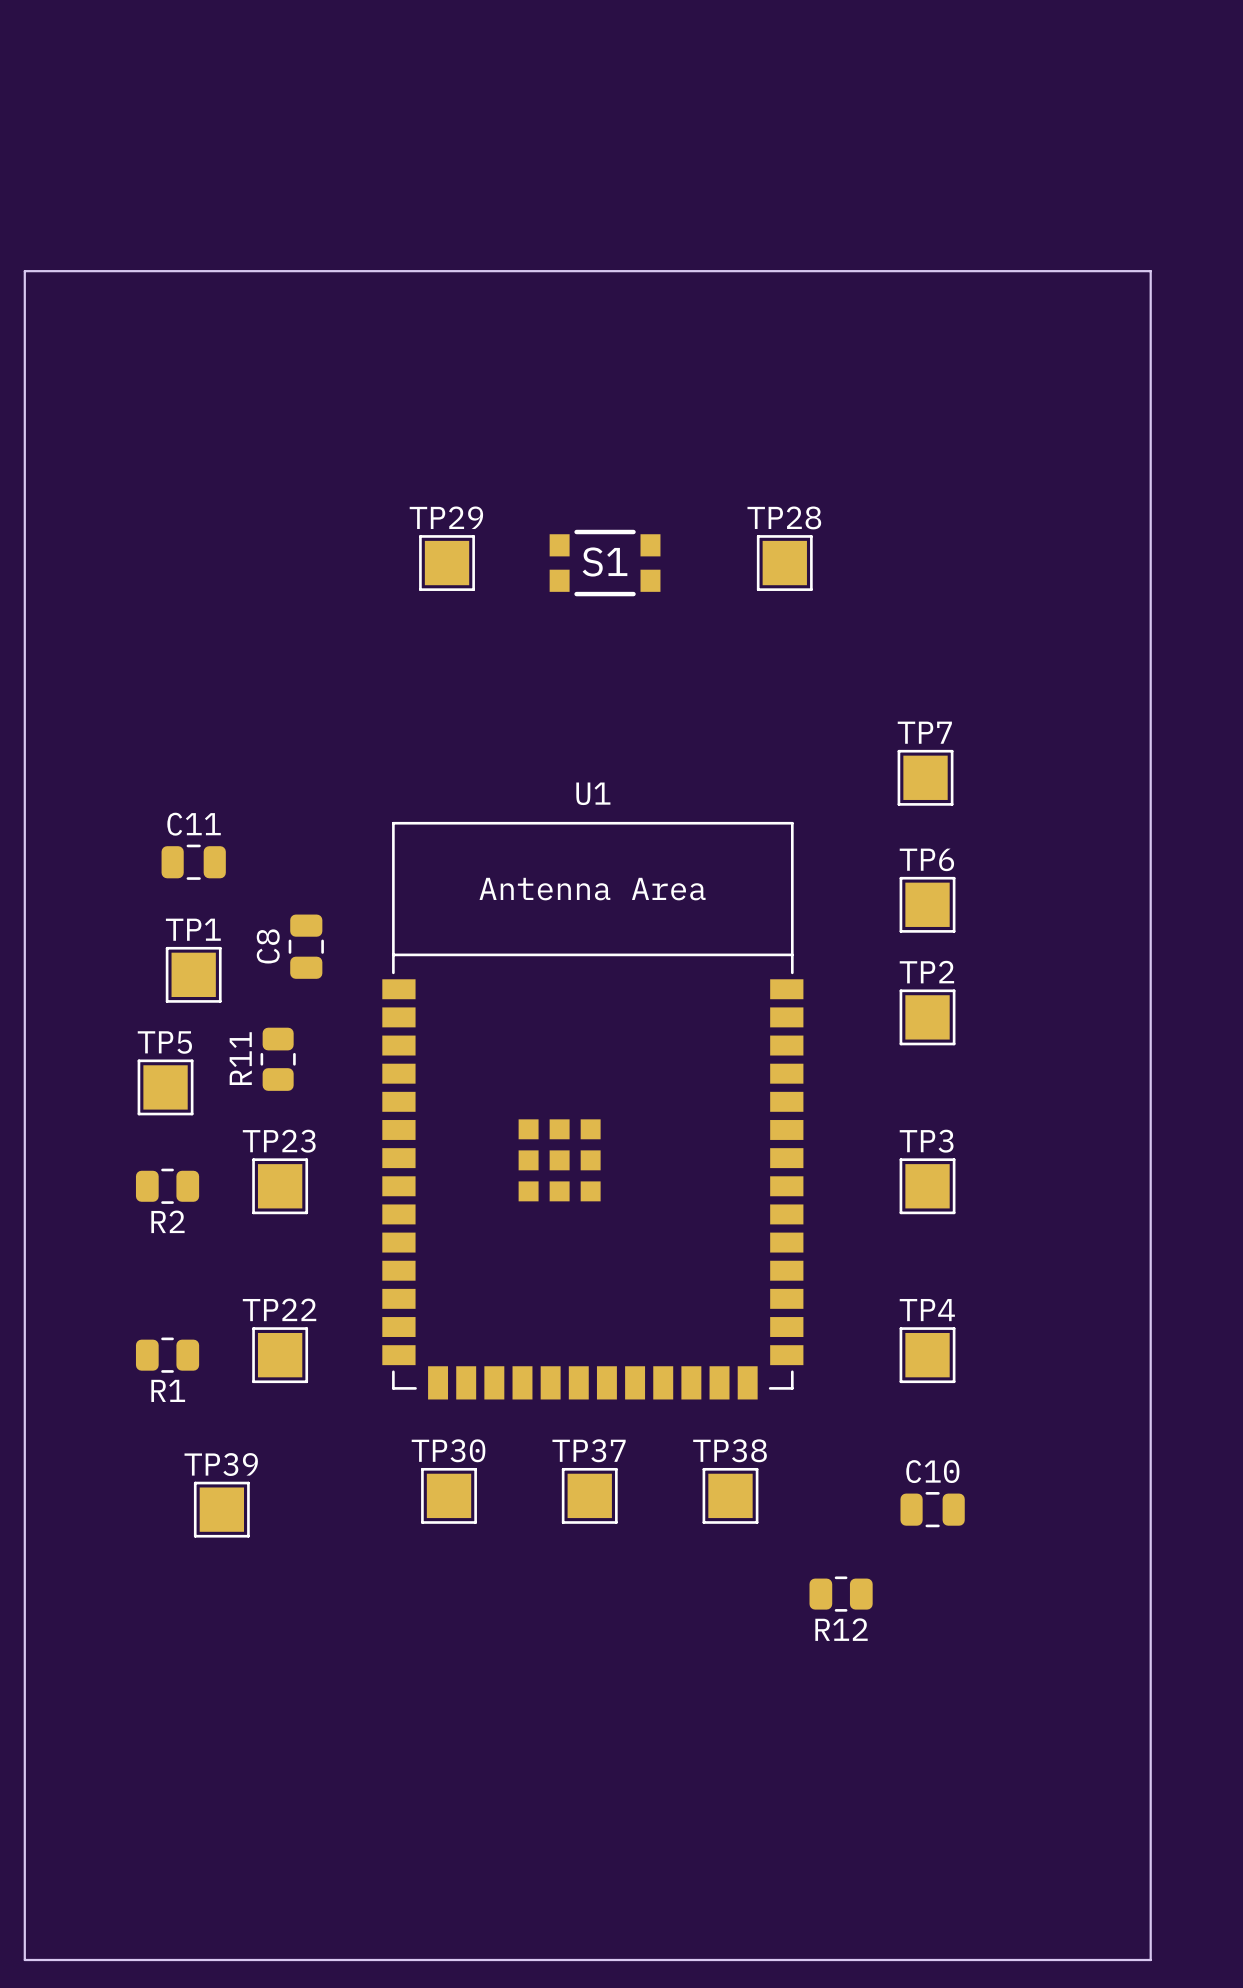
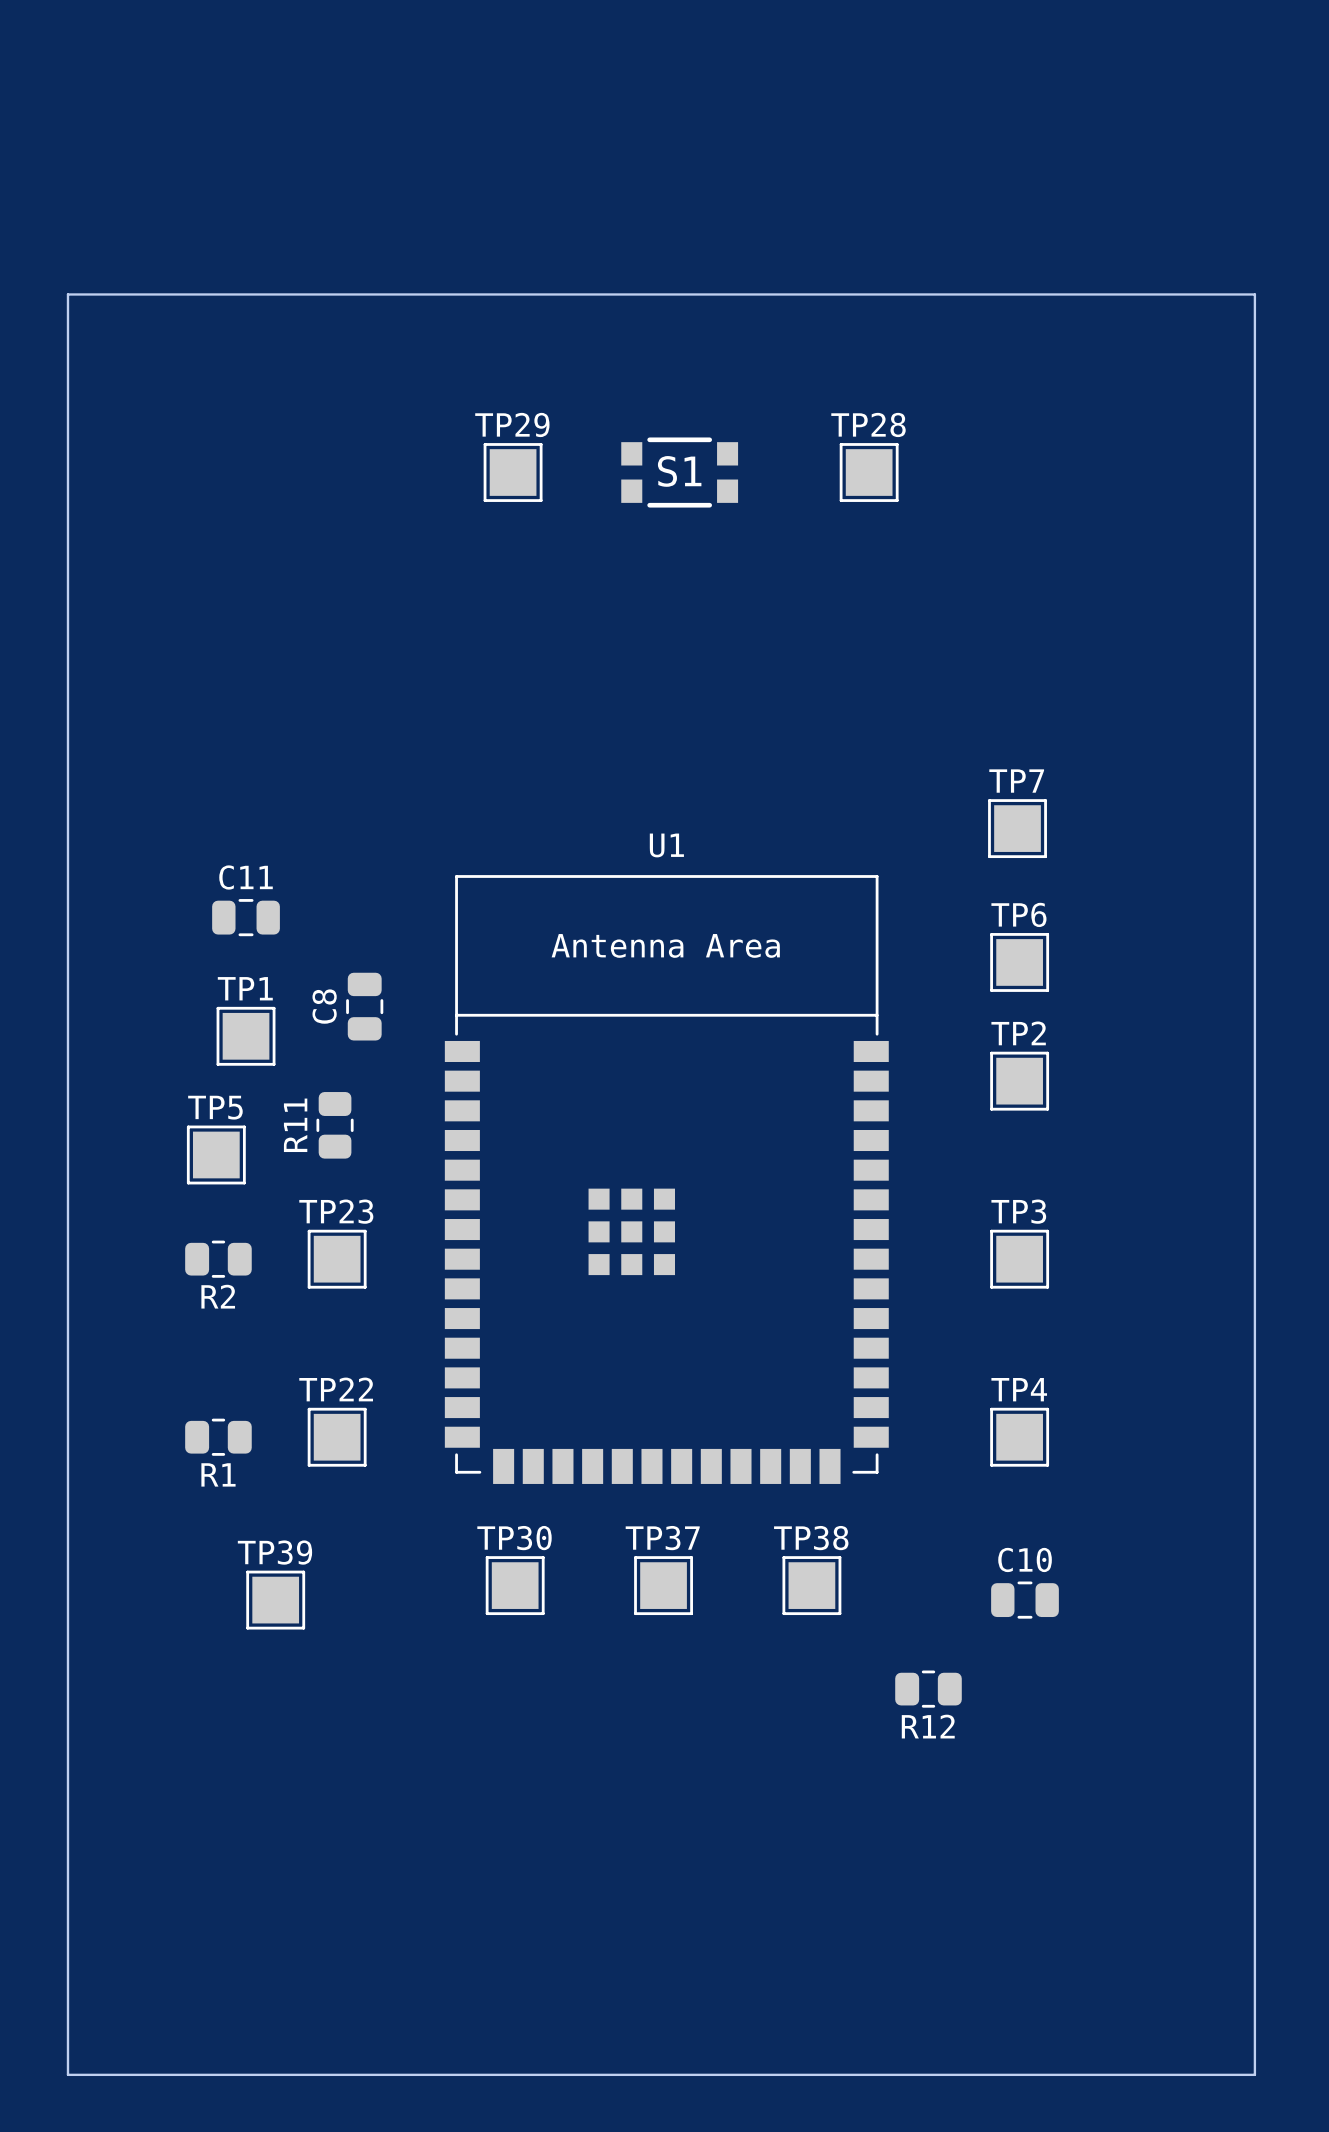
TP29 position: (447, 563) -> (513, 472)
S1 position: (605, 563) -> (679, 472)
TP28 position: (784, 563) -> (869, 472)

